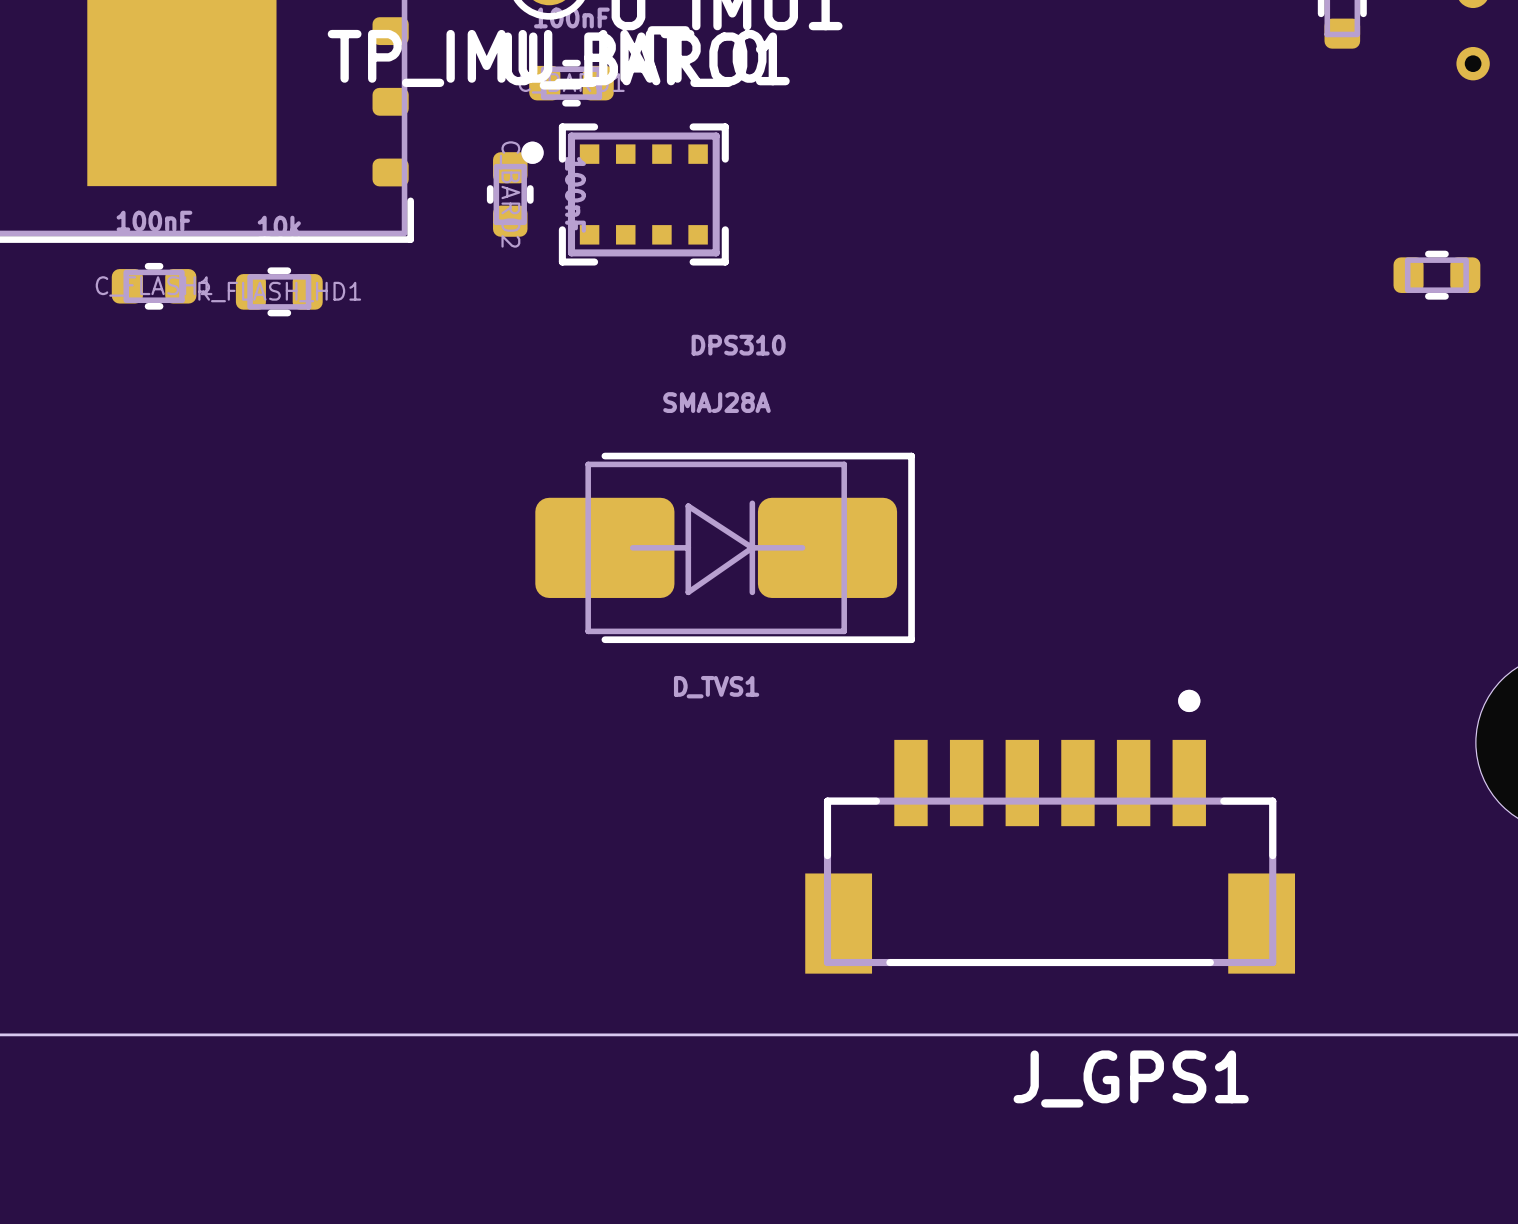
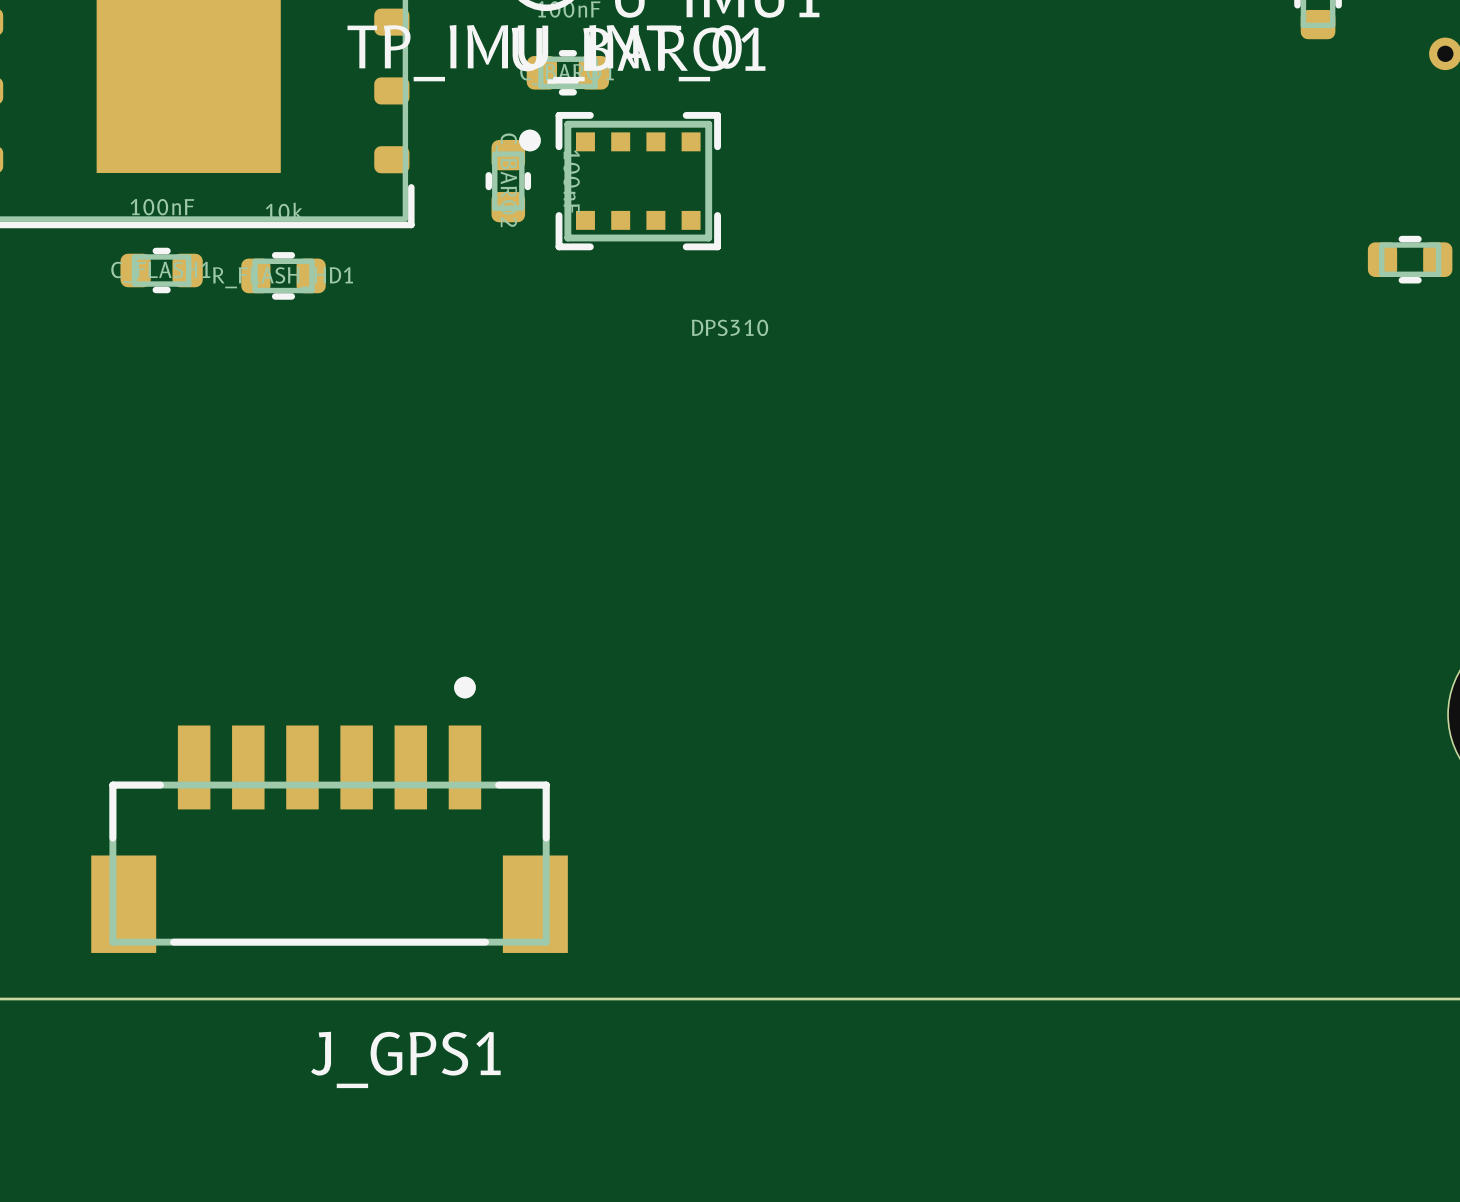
D_TVS1: SMAJ28A (725, 547) -> none
J_GPS1 position: (1050, 831) -> (329, 814)

